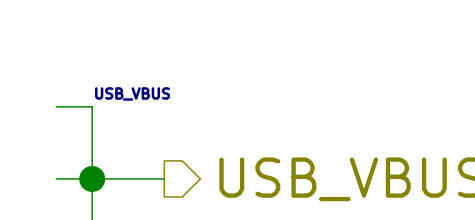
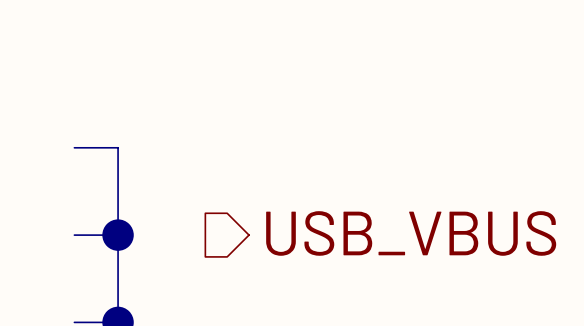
text: USB_VBUS (132, 93) -> none
wire: (92, 178) (164, 178) -> none

